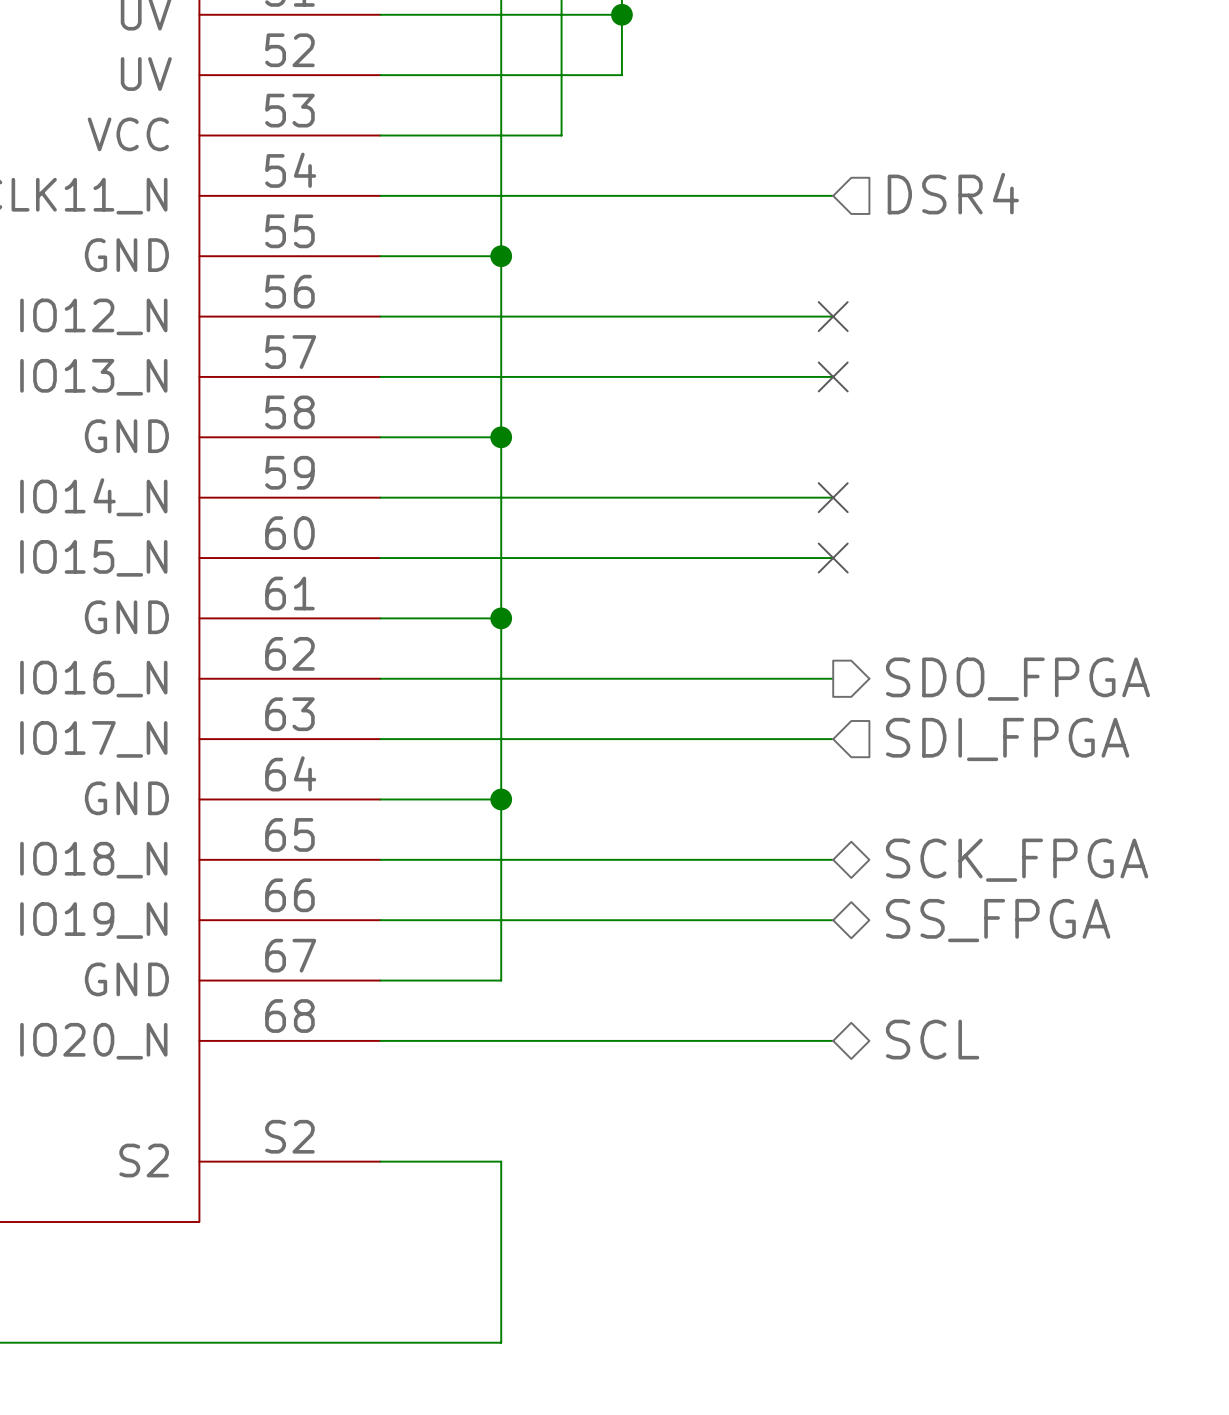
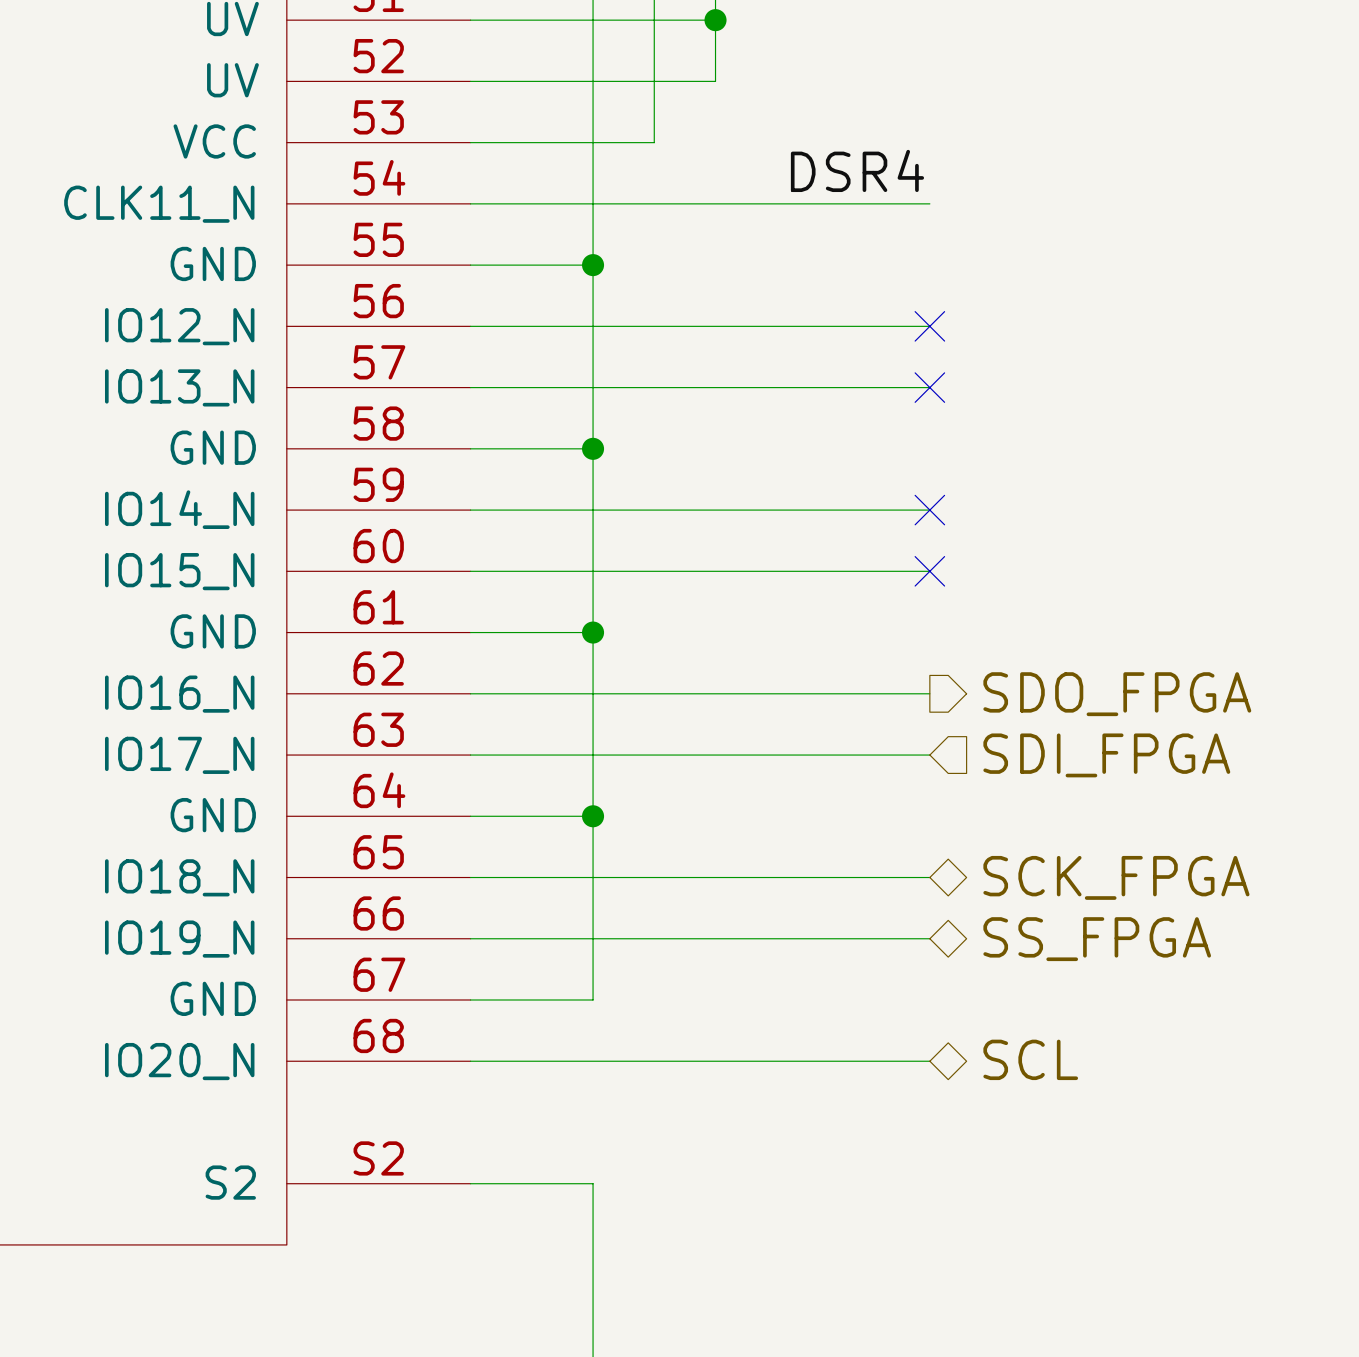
label: none -> DSR4 (857, 170)
hierarchical label: DSR4 (953, 193) -> none

